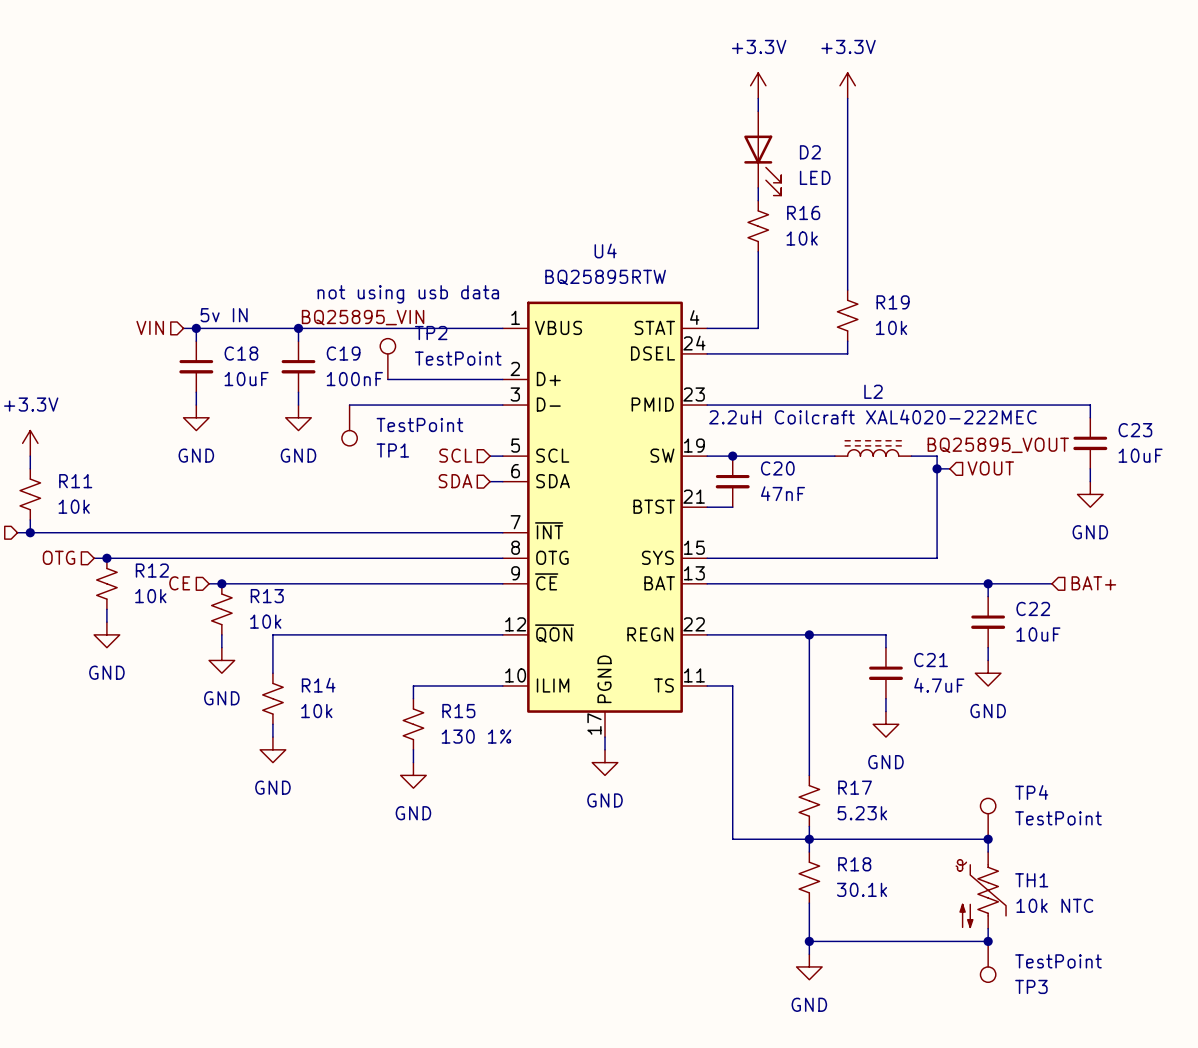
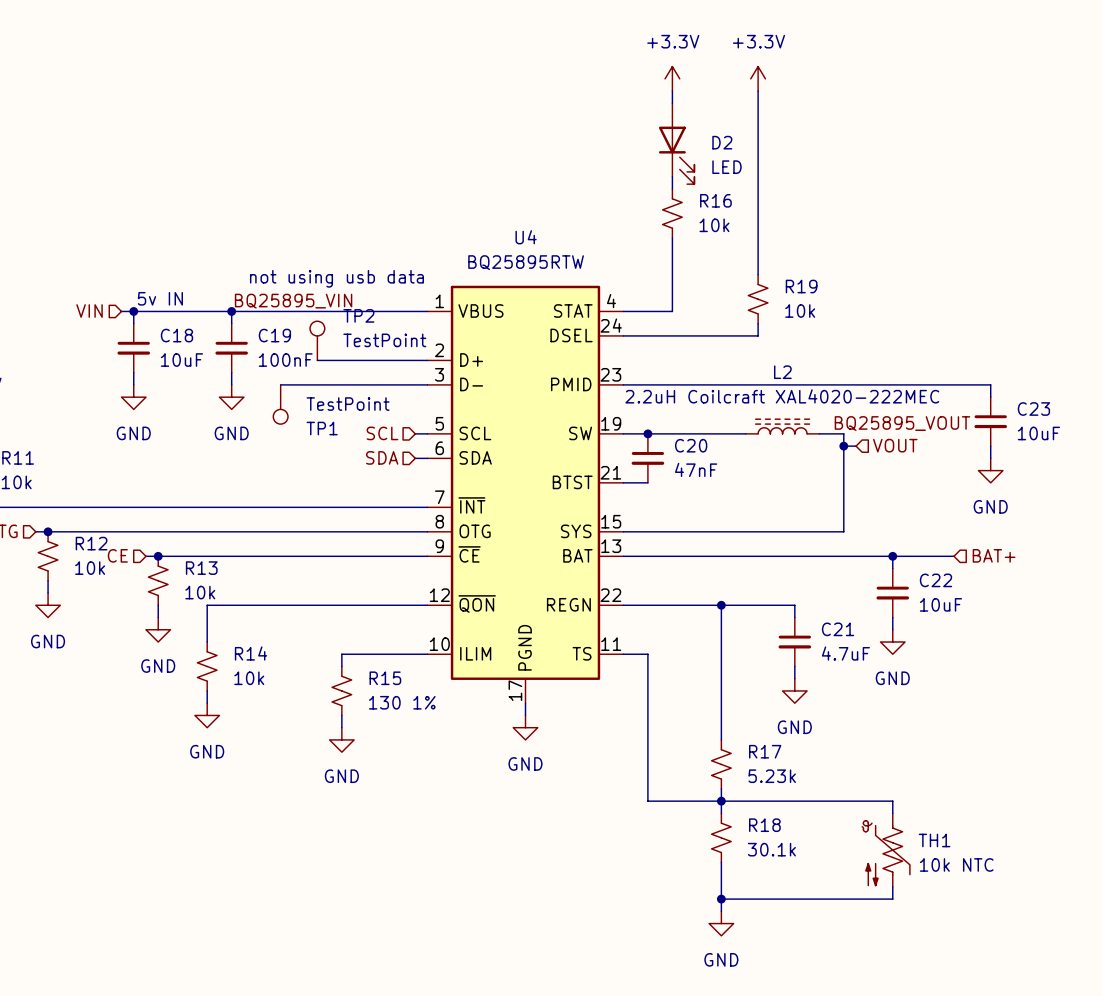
TP4: TestPoint (988, 818) -> none
junction: (988, 839) -> none
junction: (988, 941) -> none
TP3: TestPoint (988, 961) -> none

